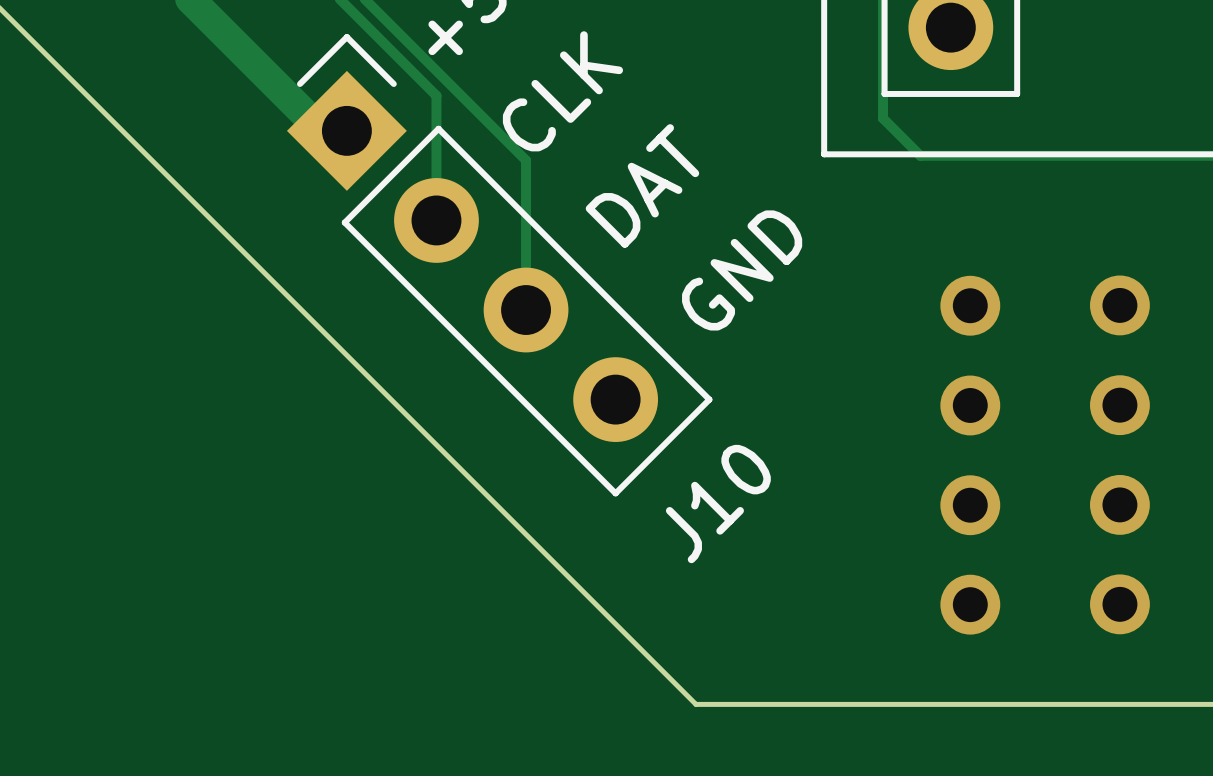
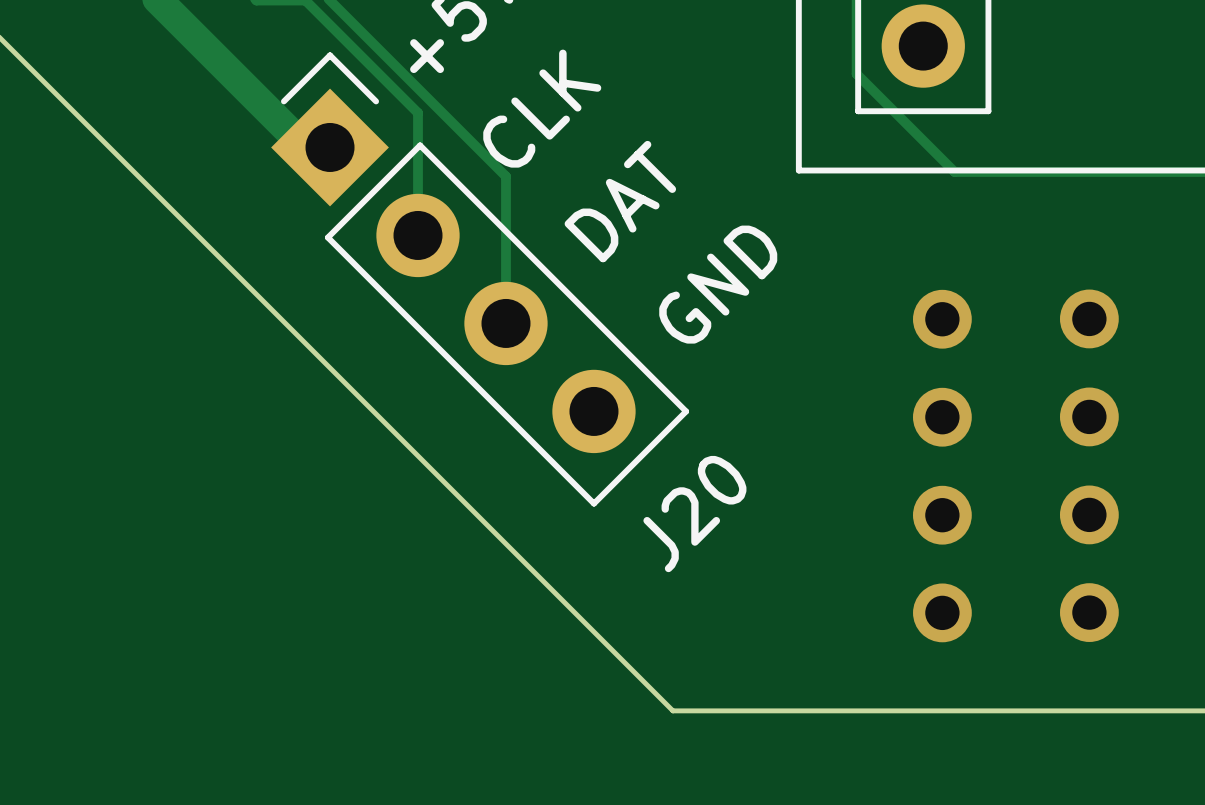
track: (883, 56) (883, 118) (920, 155) (982, 155) -> (856, 74) (954, 171)
J10 name: J10 (718, 504) -> J20 (694, 514)

